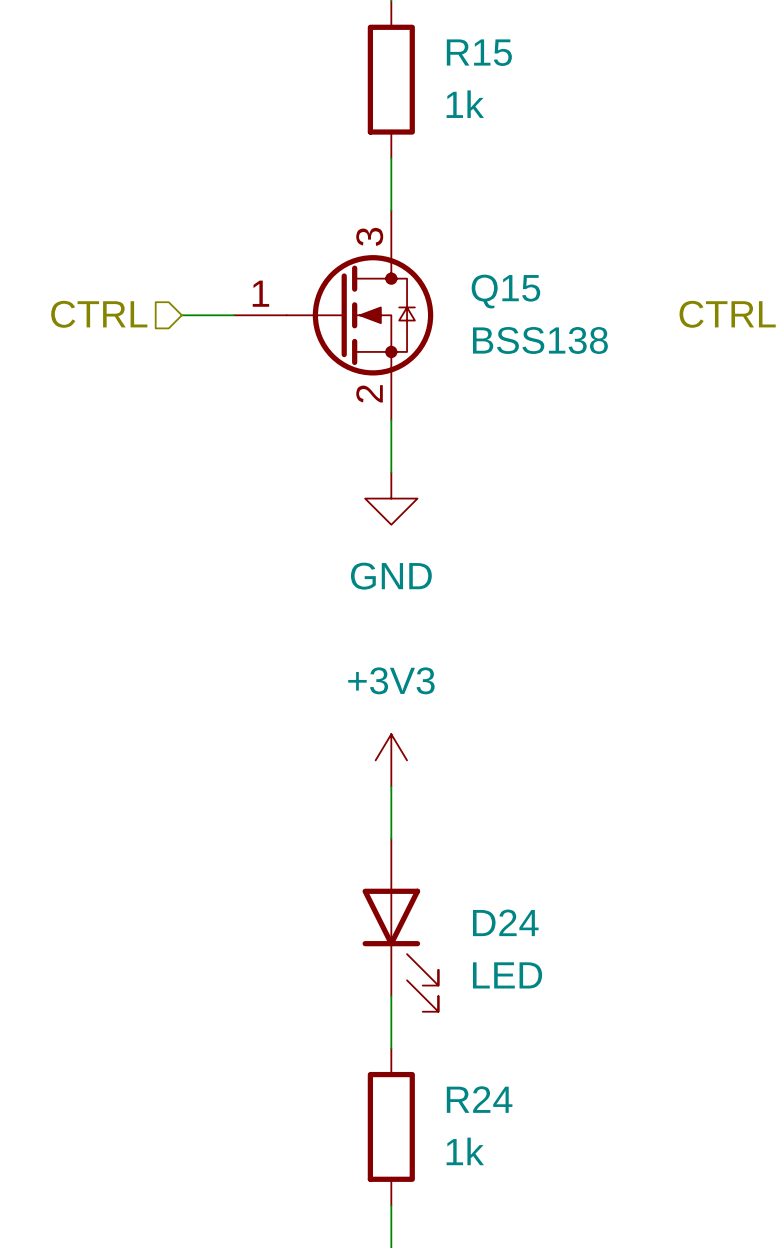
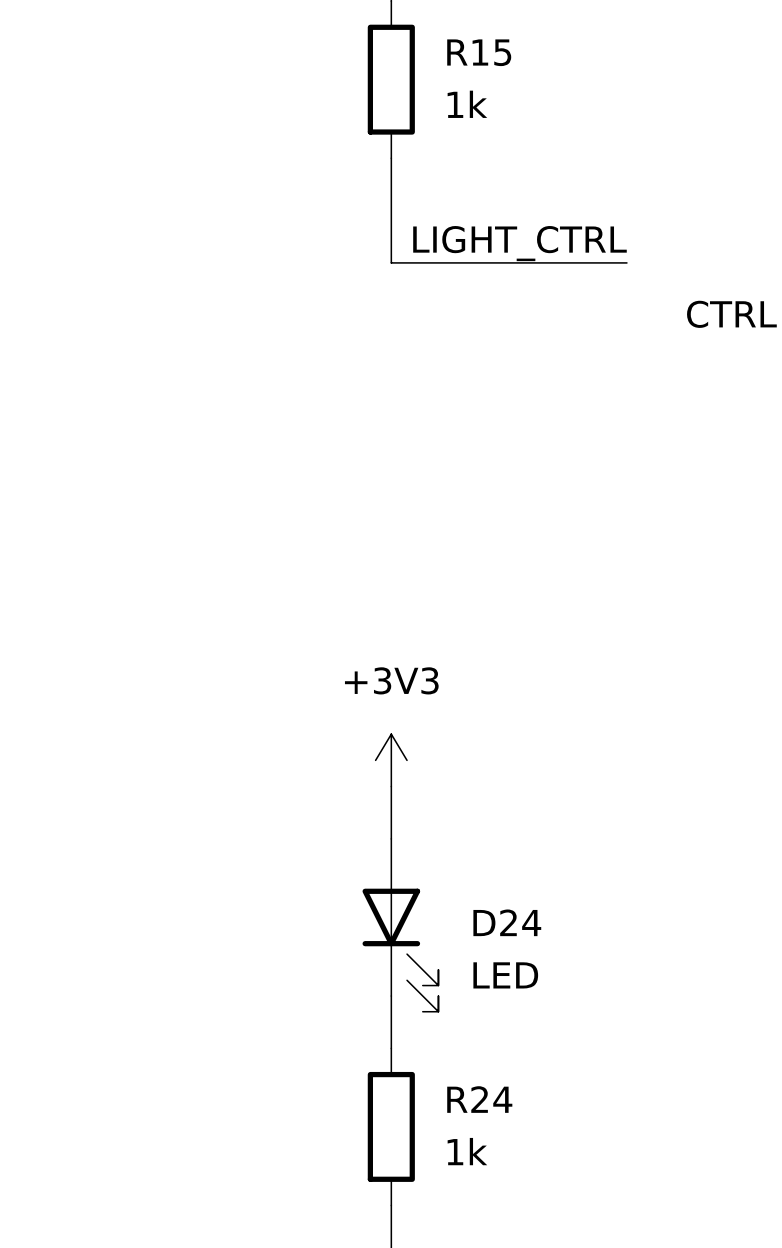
wire: none -> (391, 210) (391, 262) (626, 262)
label: none -> LIGHT_CTRL (519, 243)
hierarchical label: CTRL (99, 314) -> none
wire: (181, 315) (234, 315) -> none
Q15: BSS138 (333, 315) -> none
wire: (391, 420) (391, 472) -> none
power symbol: GND (391, 498) -> none

